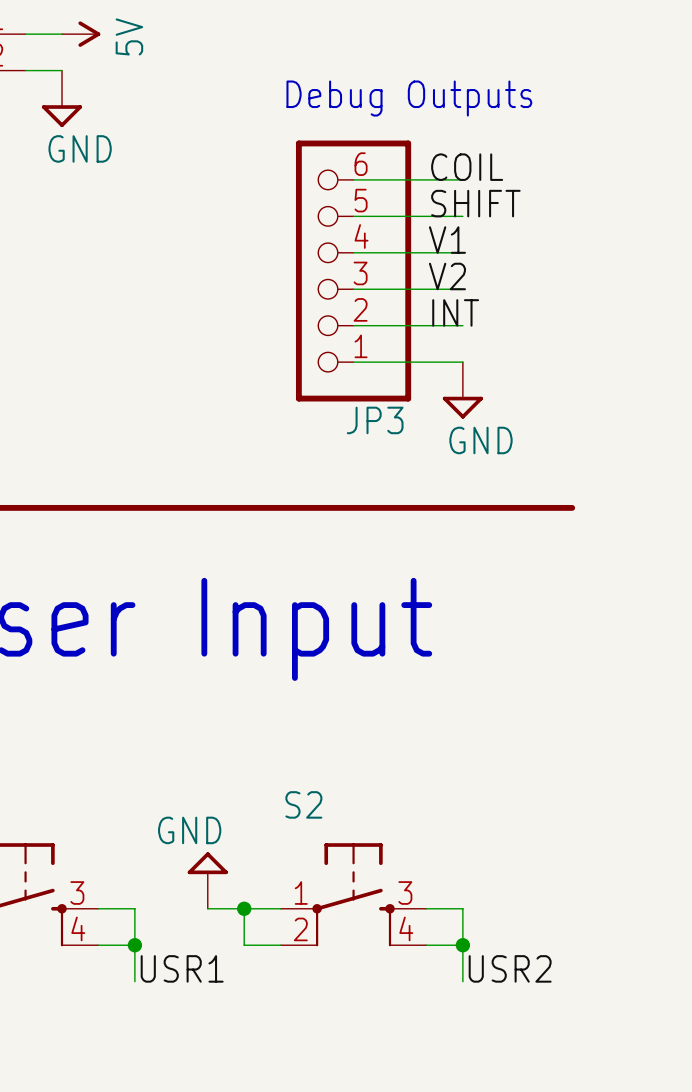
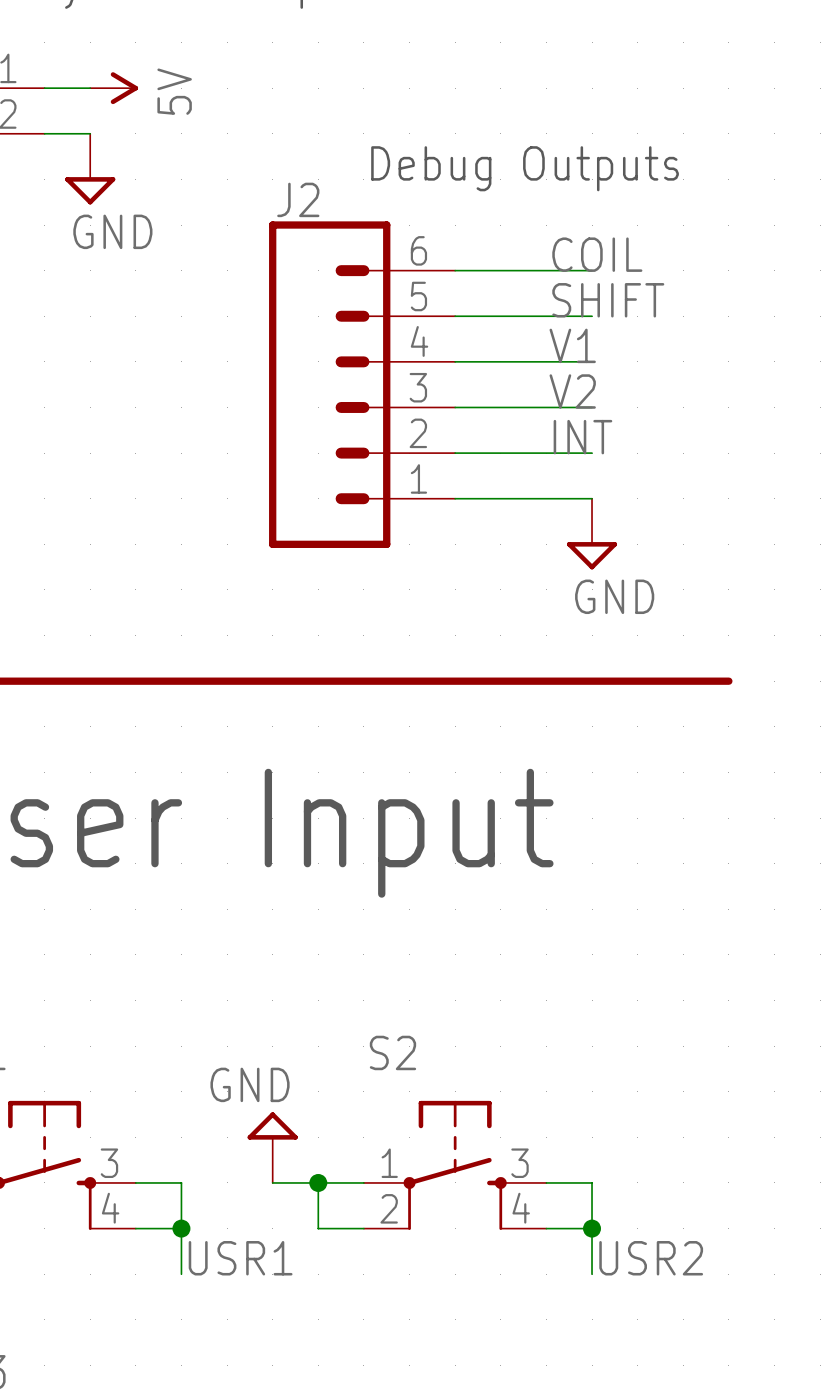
J2: none -> (362, 384)
JP3: (353, 271) -> none

